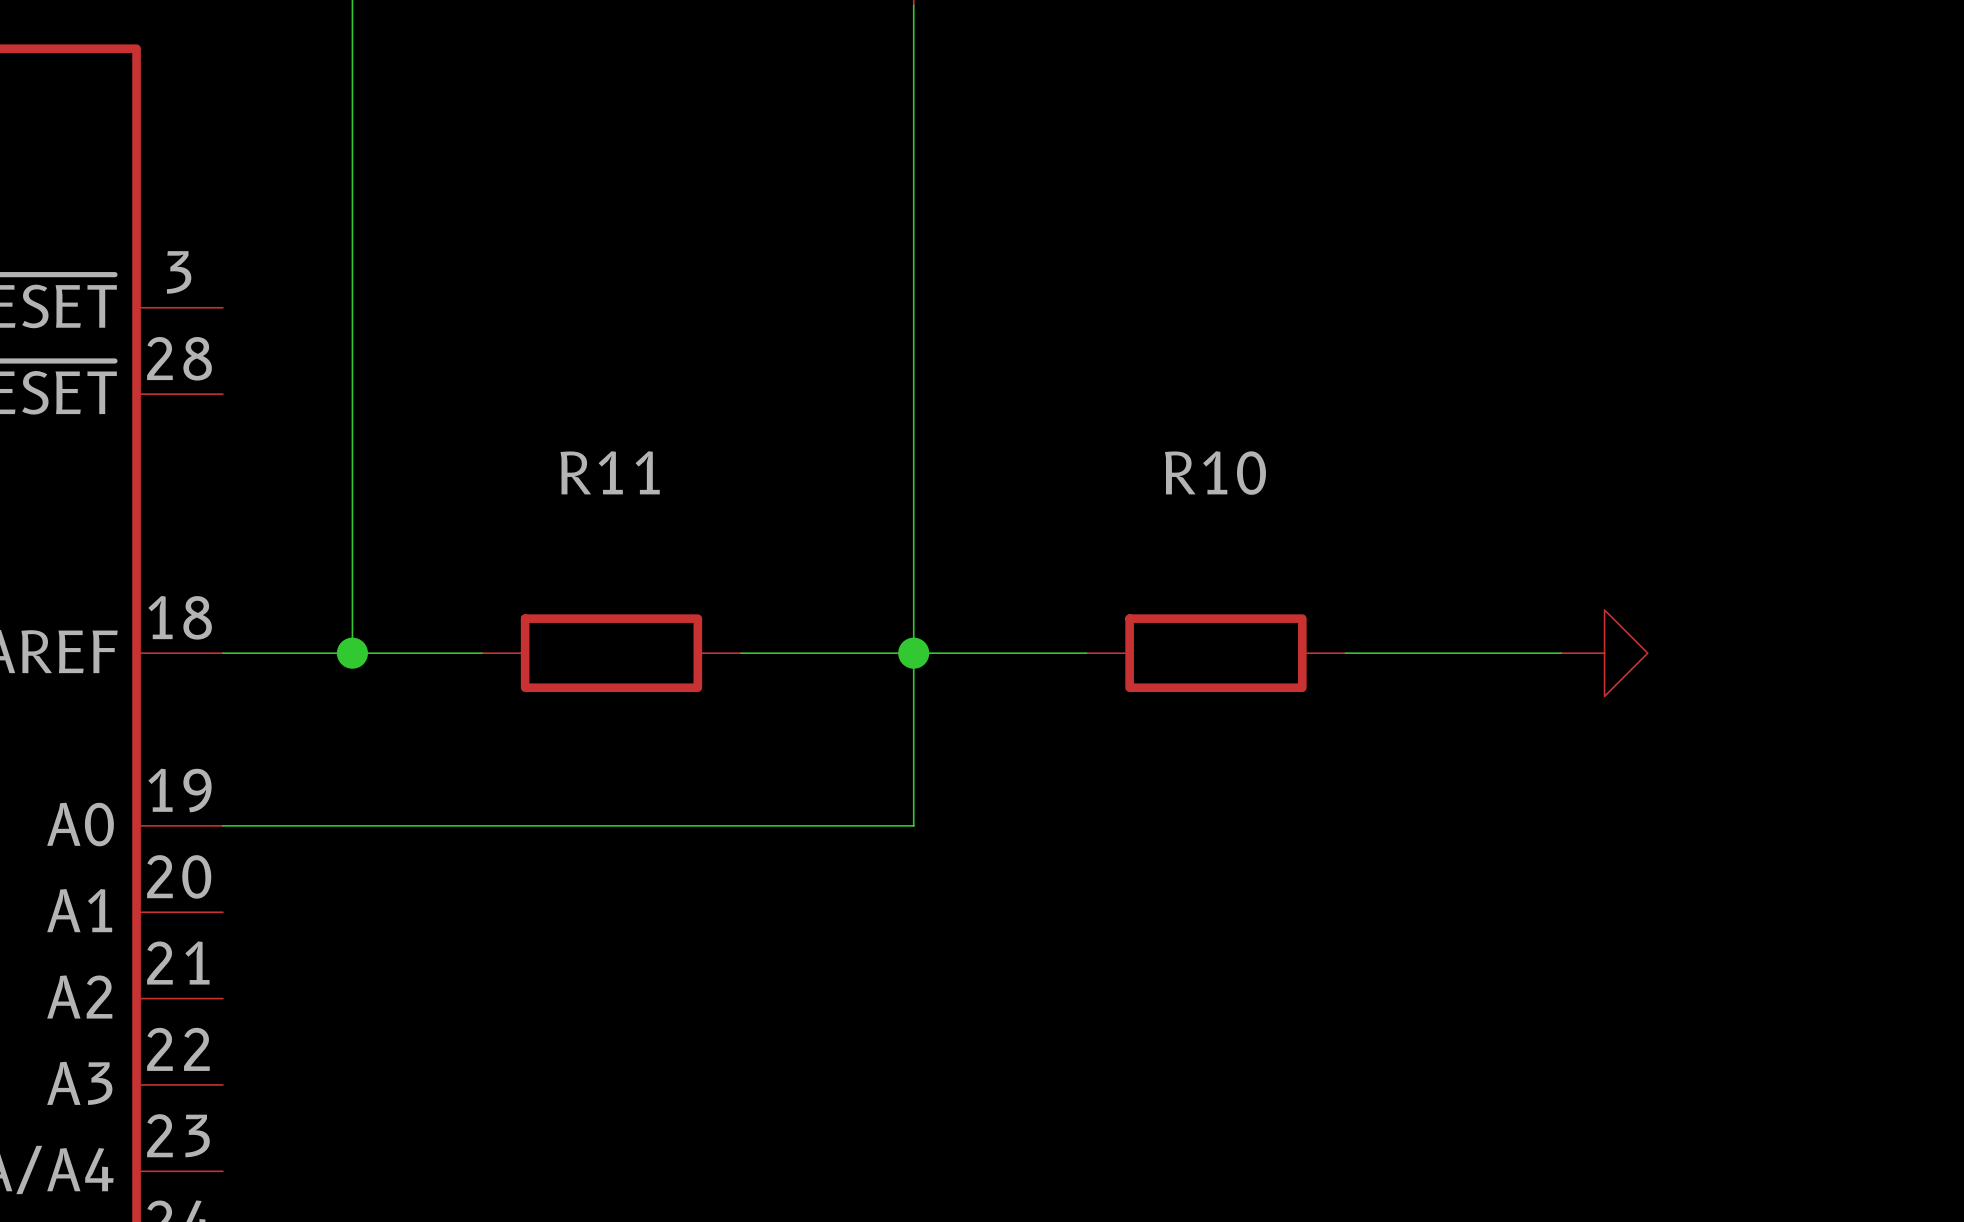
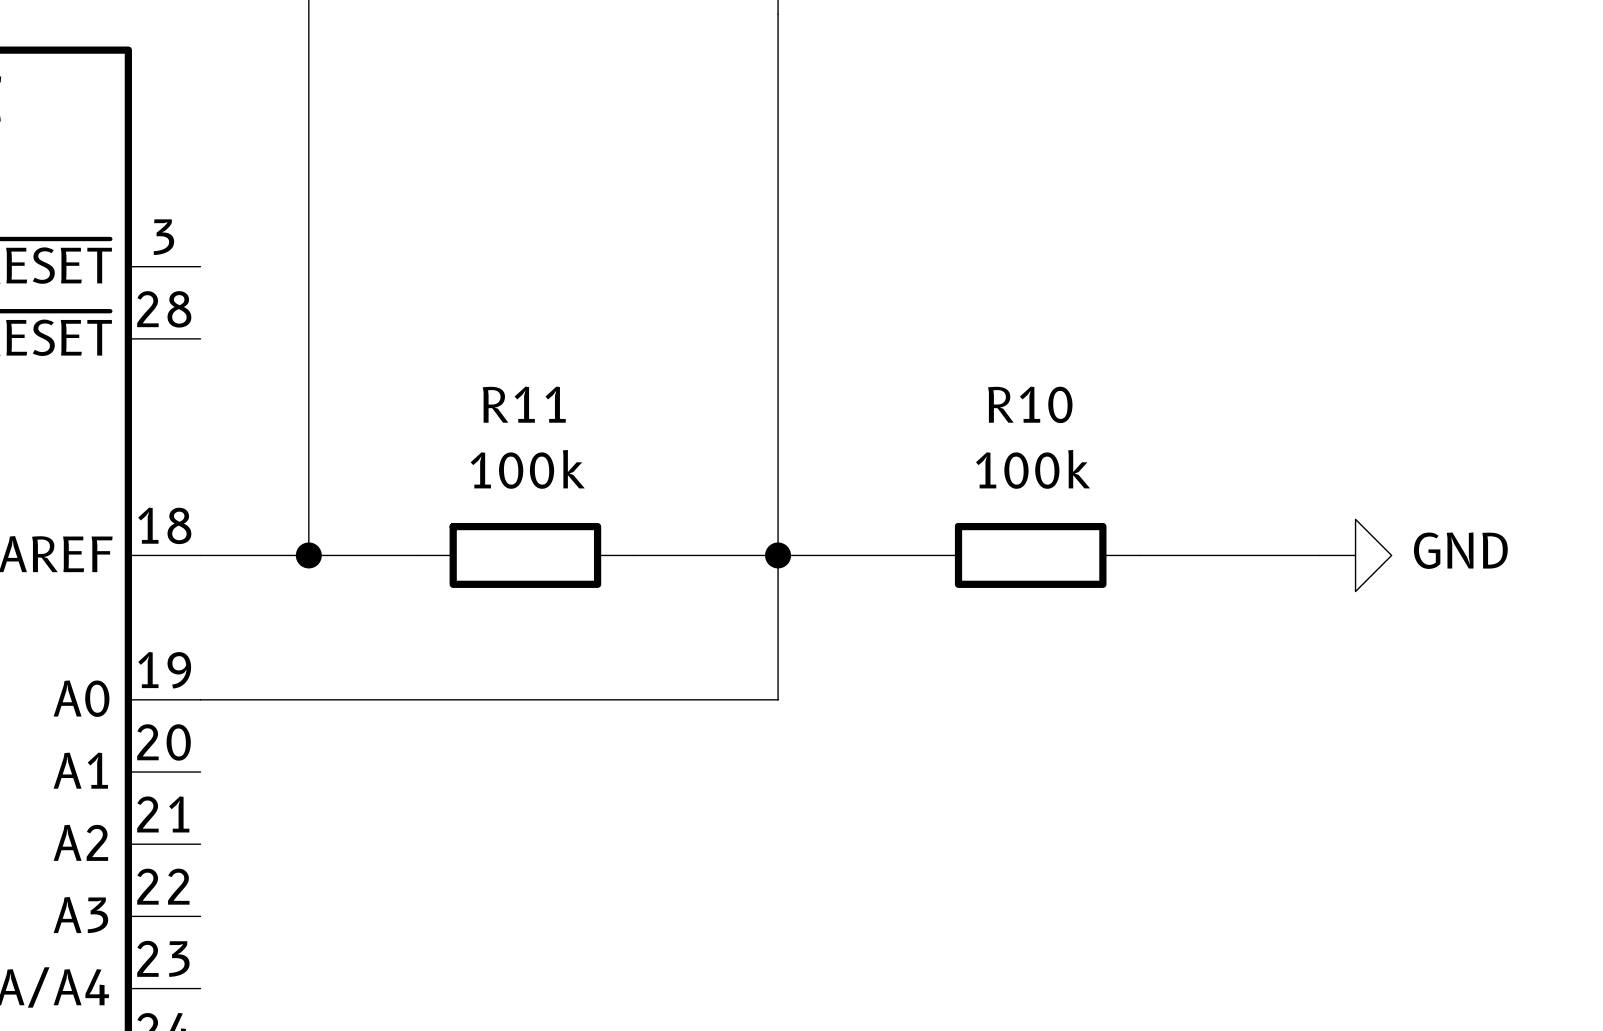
R11 value: none -> 100k (527, 469)
R10 value: none -> 100k (1033, 469)
power symbol text: none -> GND (1460, 550)

